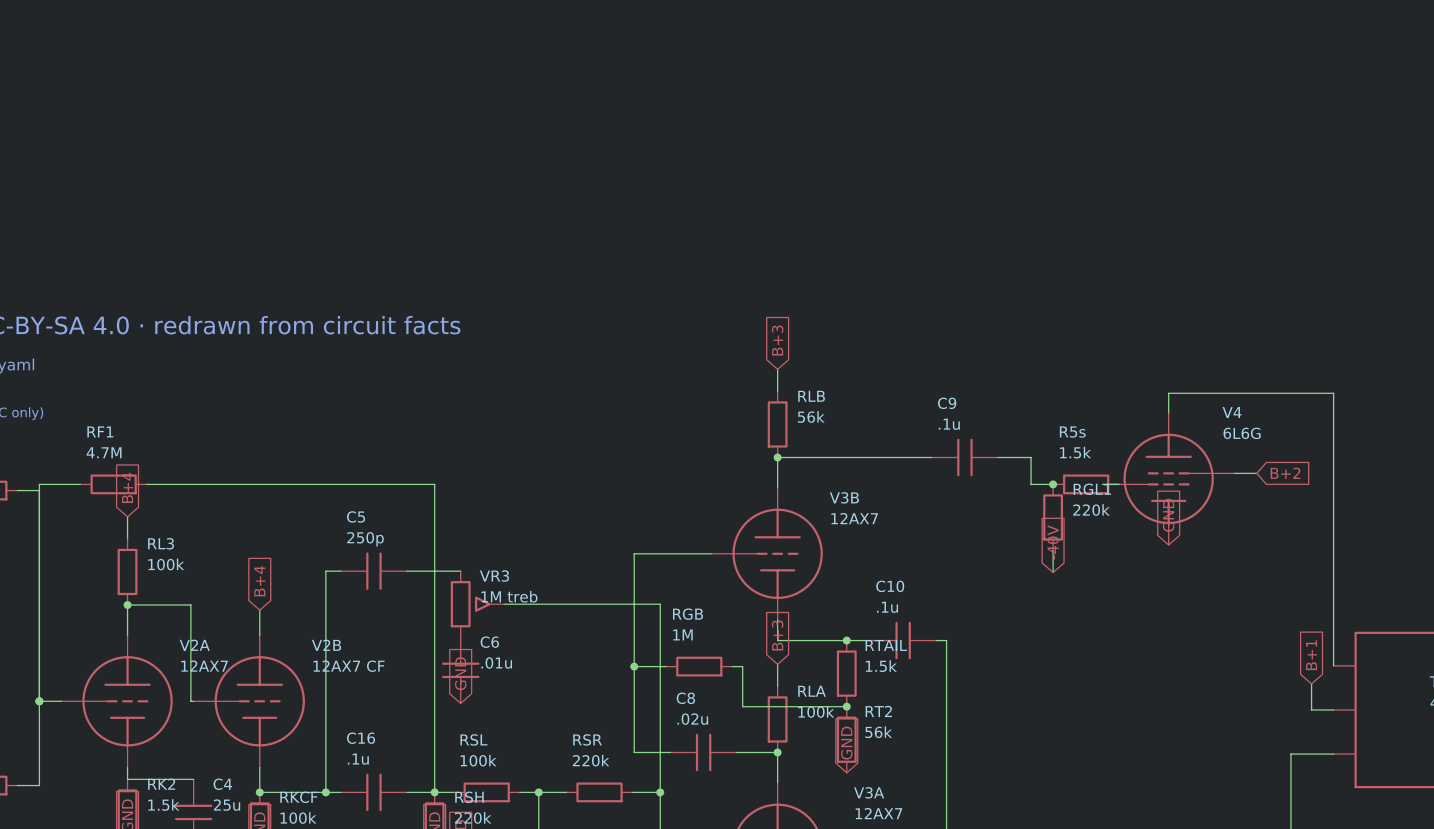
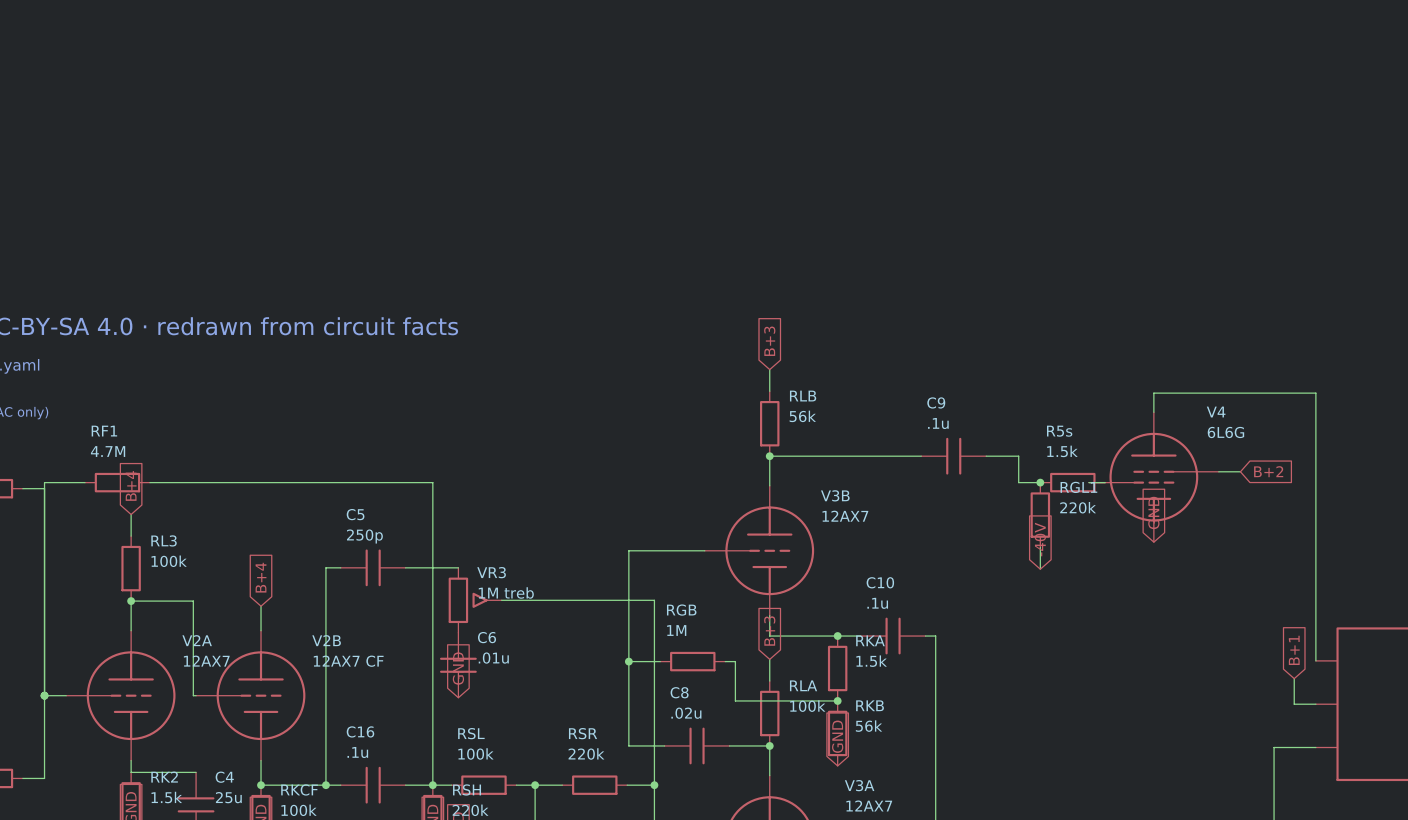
RTAIL name: RTAIL (886, 645) -> RKA (870, 640)
RT2 name: RT2 (878, 711) -> RKB (870, 705)

